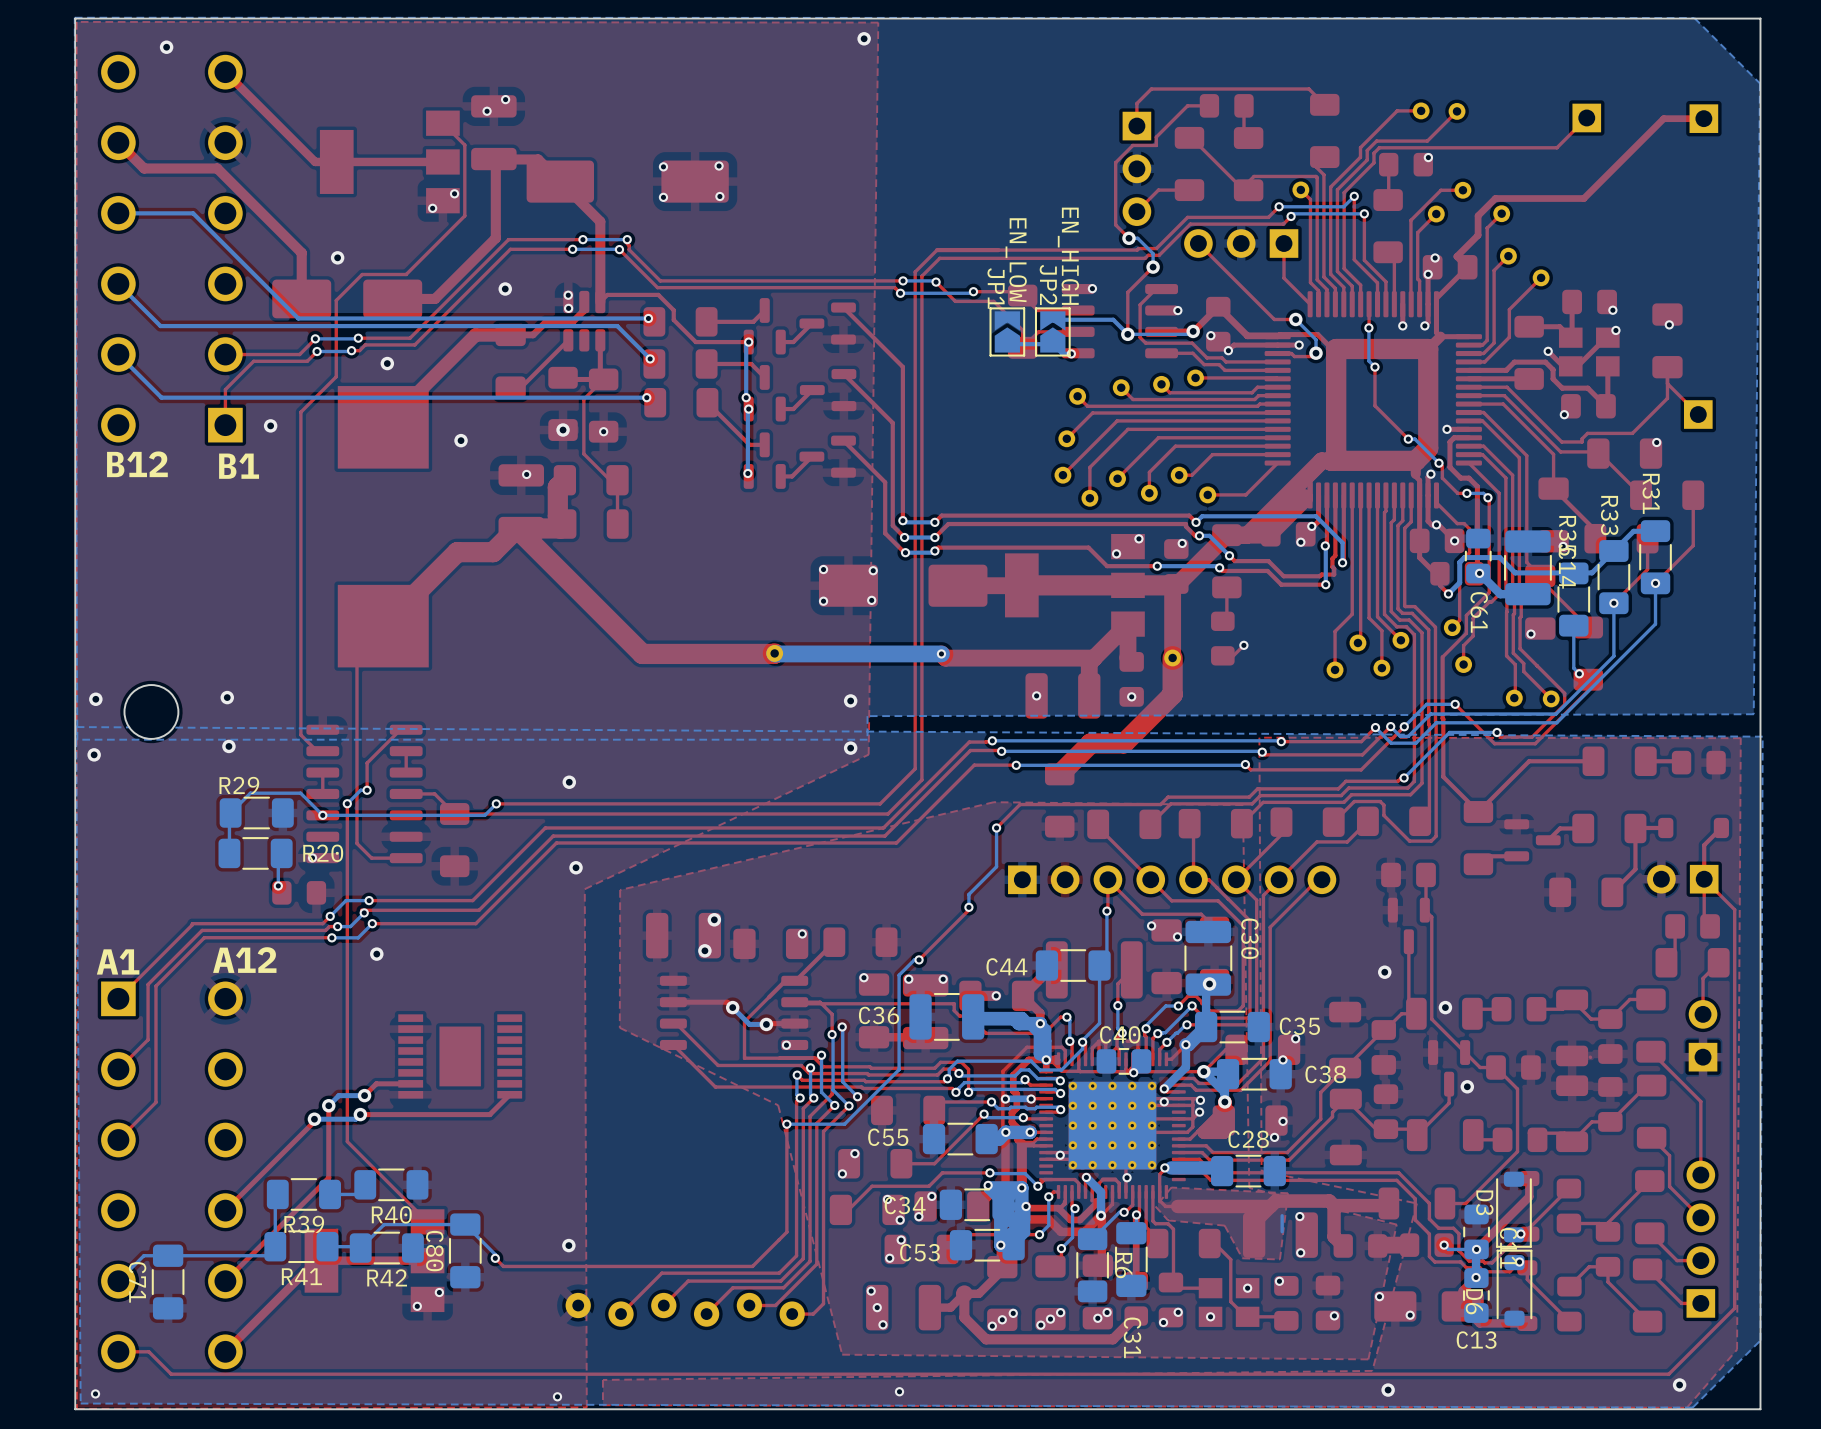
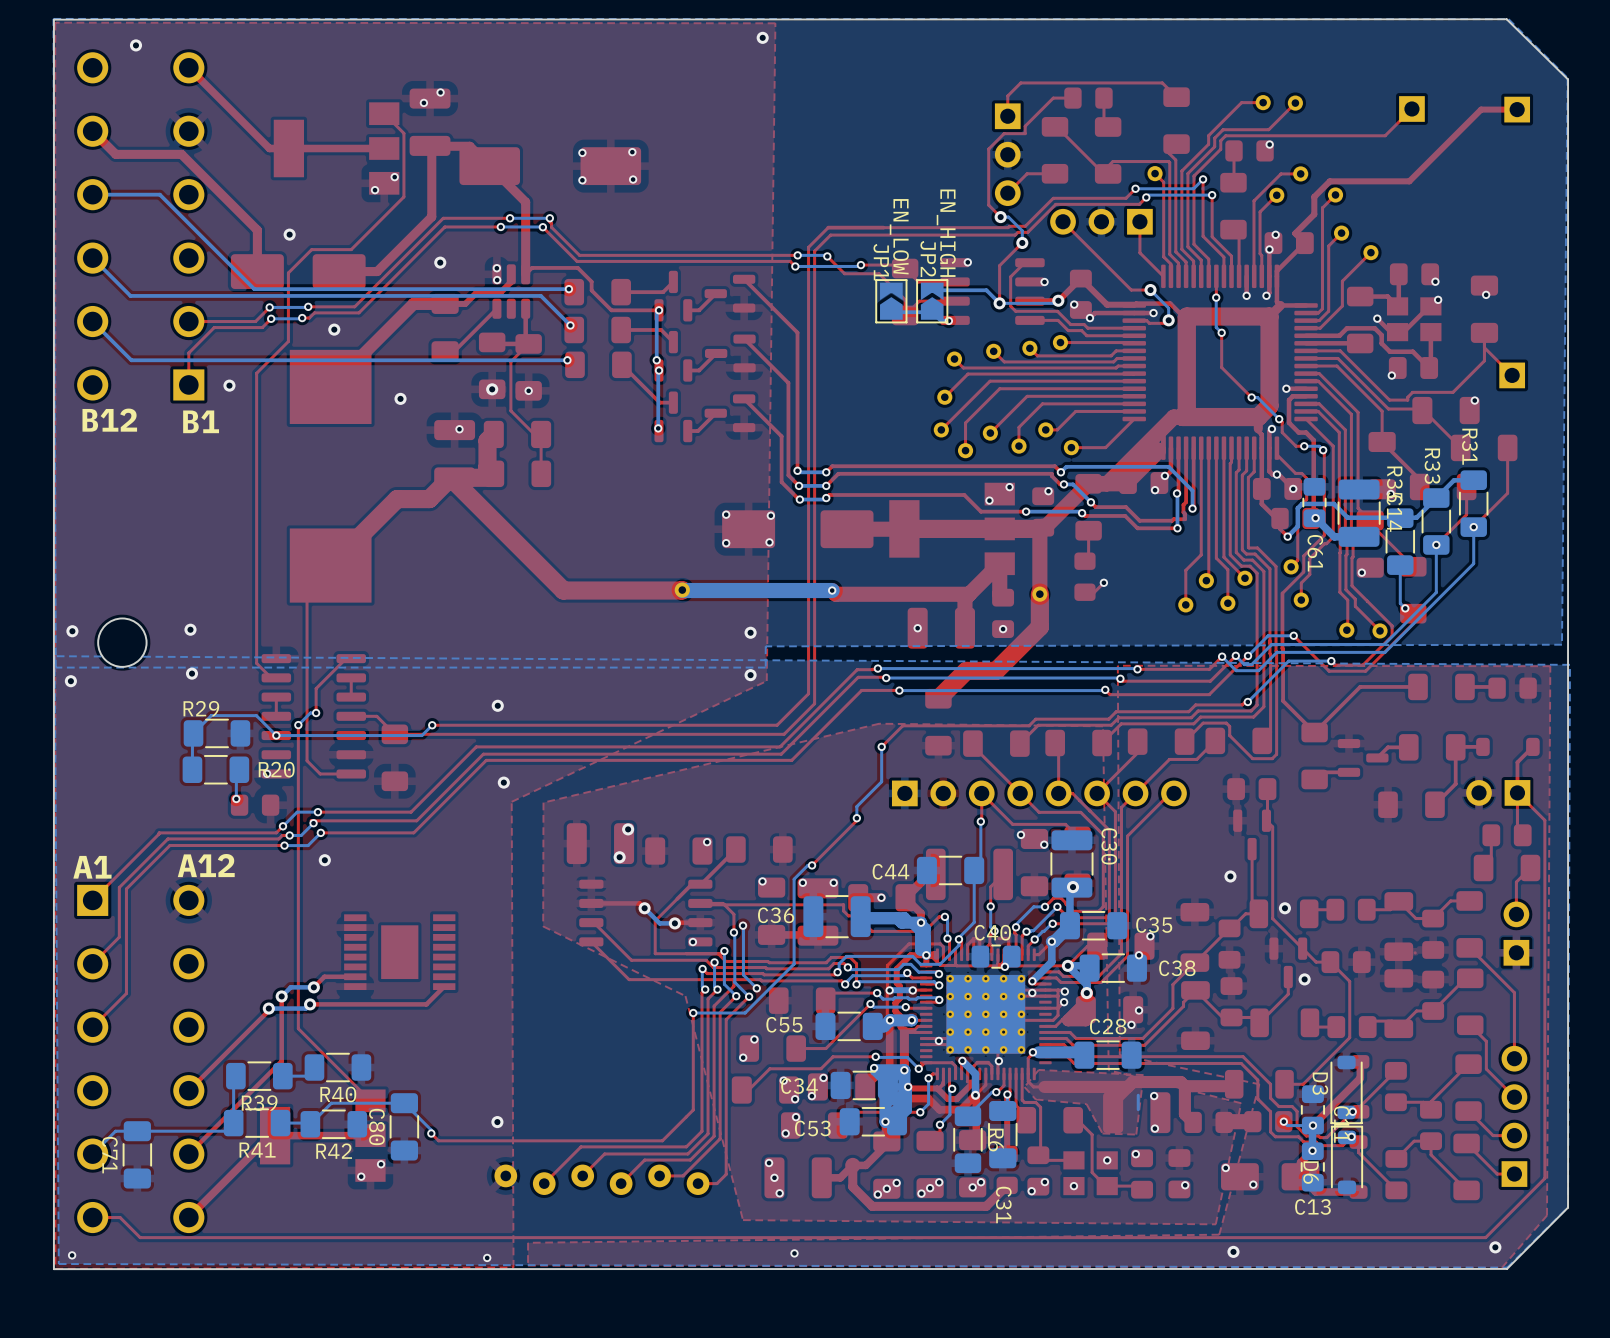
board edge: (75, 18) (1760, 18) (1760, 85) -> (53, 19) (1506, 19) (1568, 79)
board edge: (1760, 1340) (1760, 1409) (75, 1409) -> (1568, 1207) (1507, 1268) (53, 1269)

